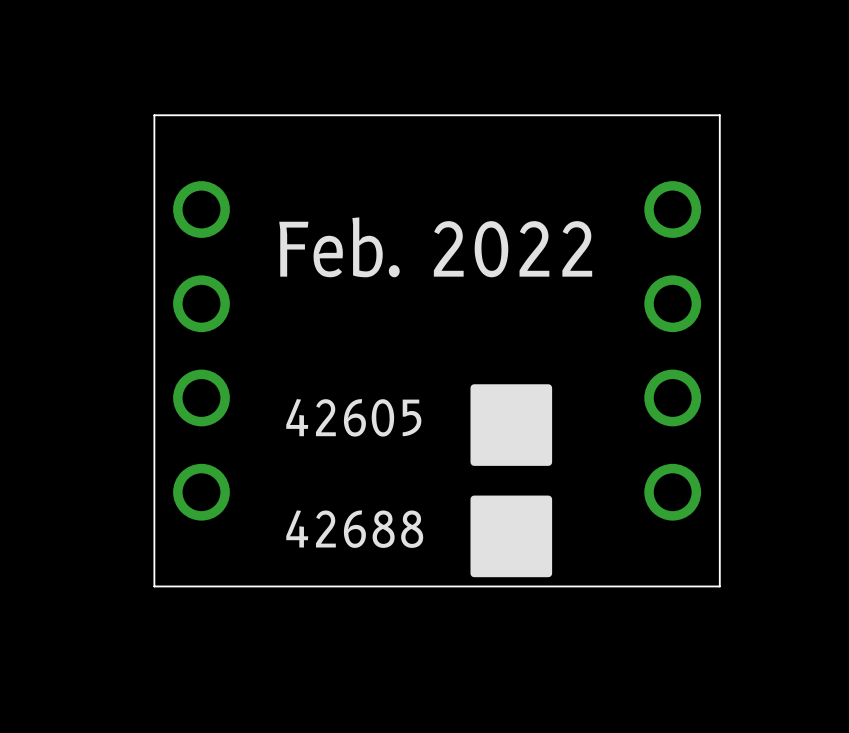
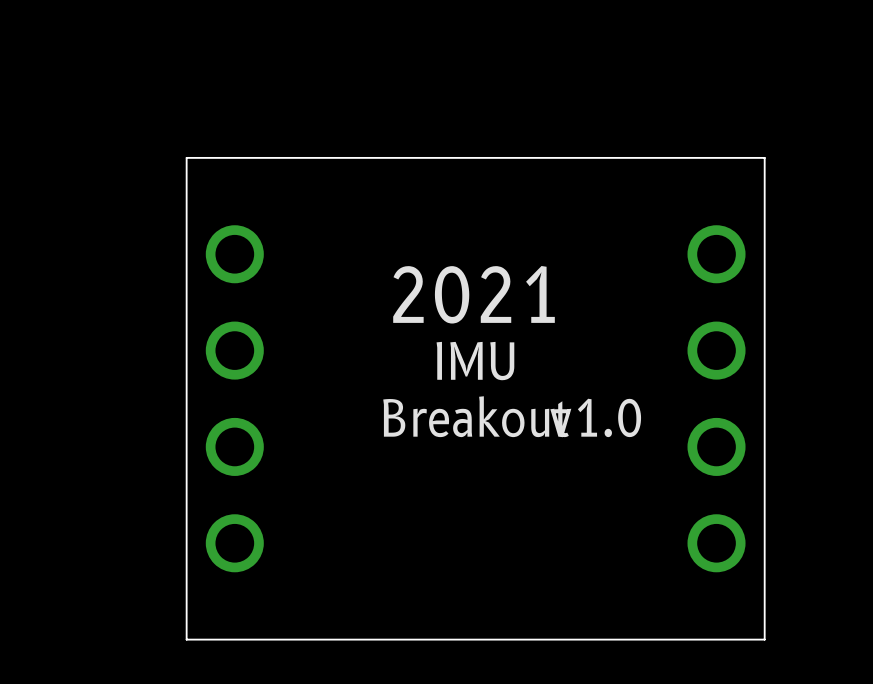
text: Feb. 2022 (435, 247) -> 2021 (474, 294)
text: none -> IMU (475, 361)
text: none -> Breakout (476, 416)
text: none -> v1.0 (595, 417)
drawing: [470, 384, 553, 578] -> none
text: 42605 (353, 417) -> none
text: 42688 (354, 529) -> none

